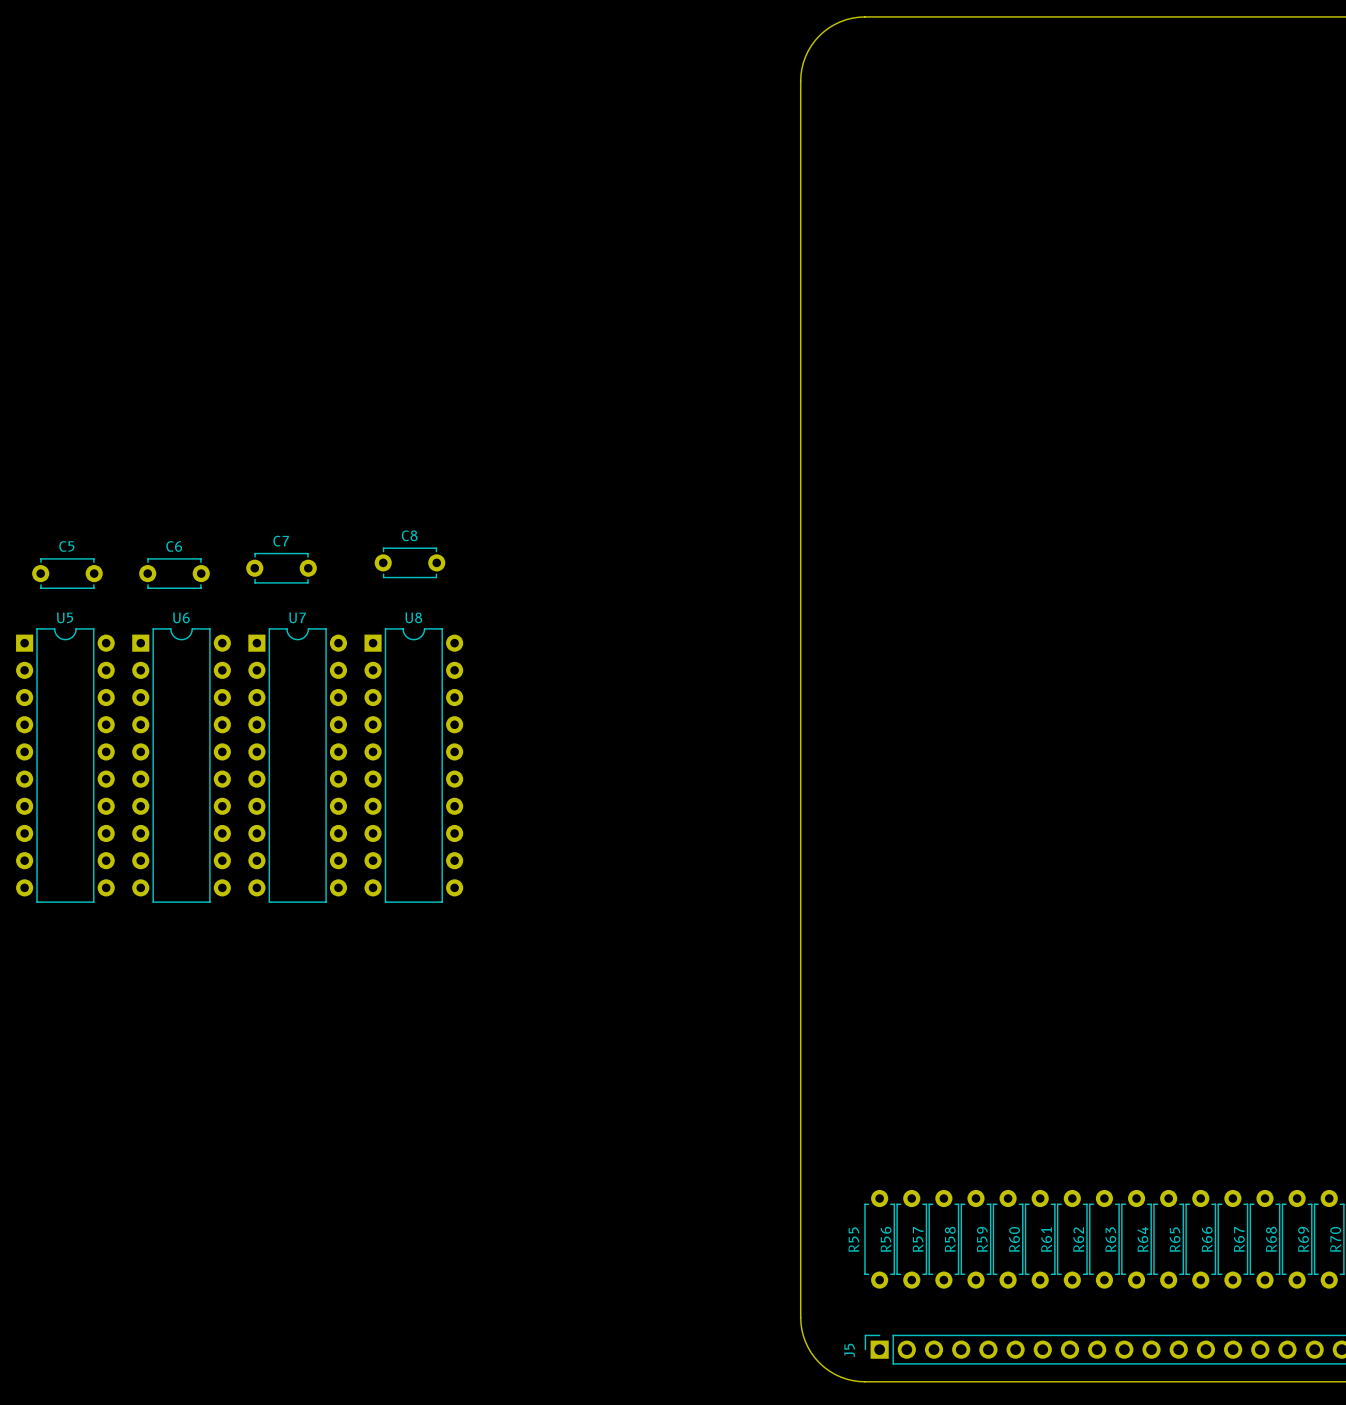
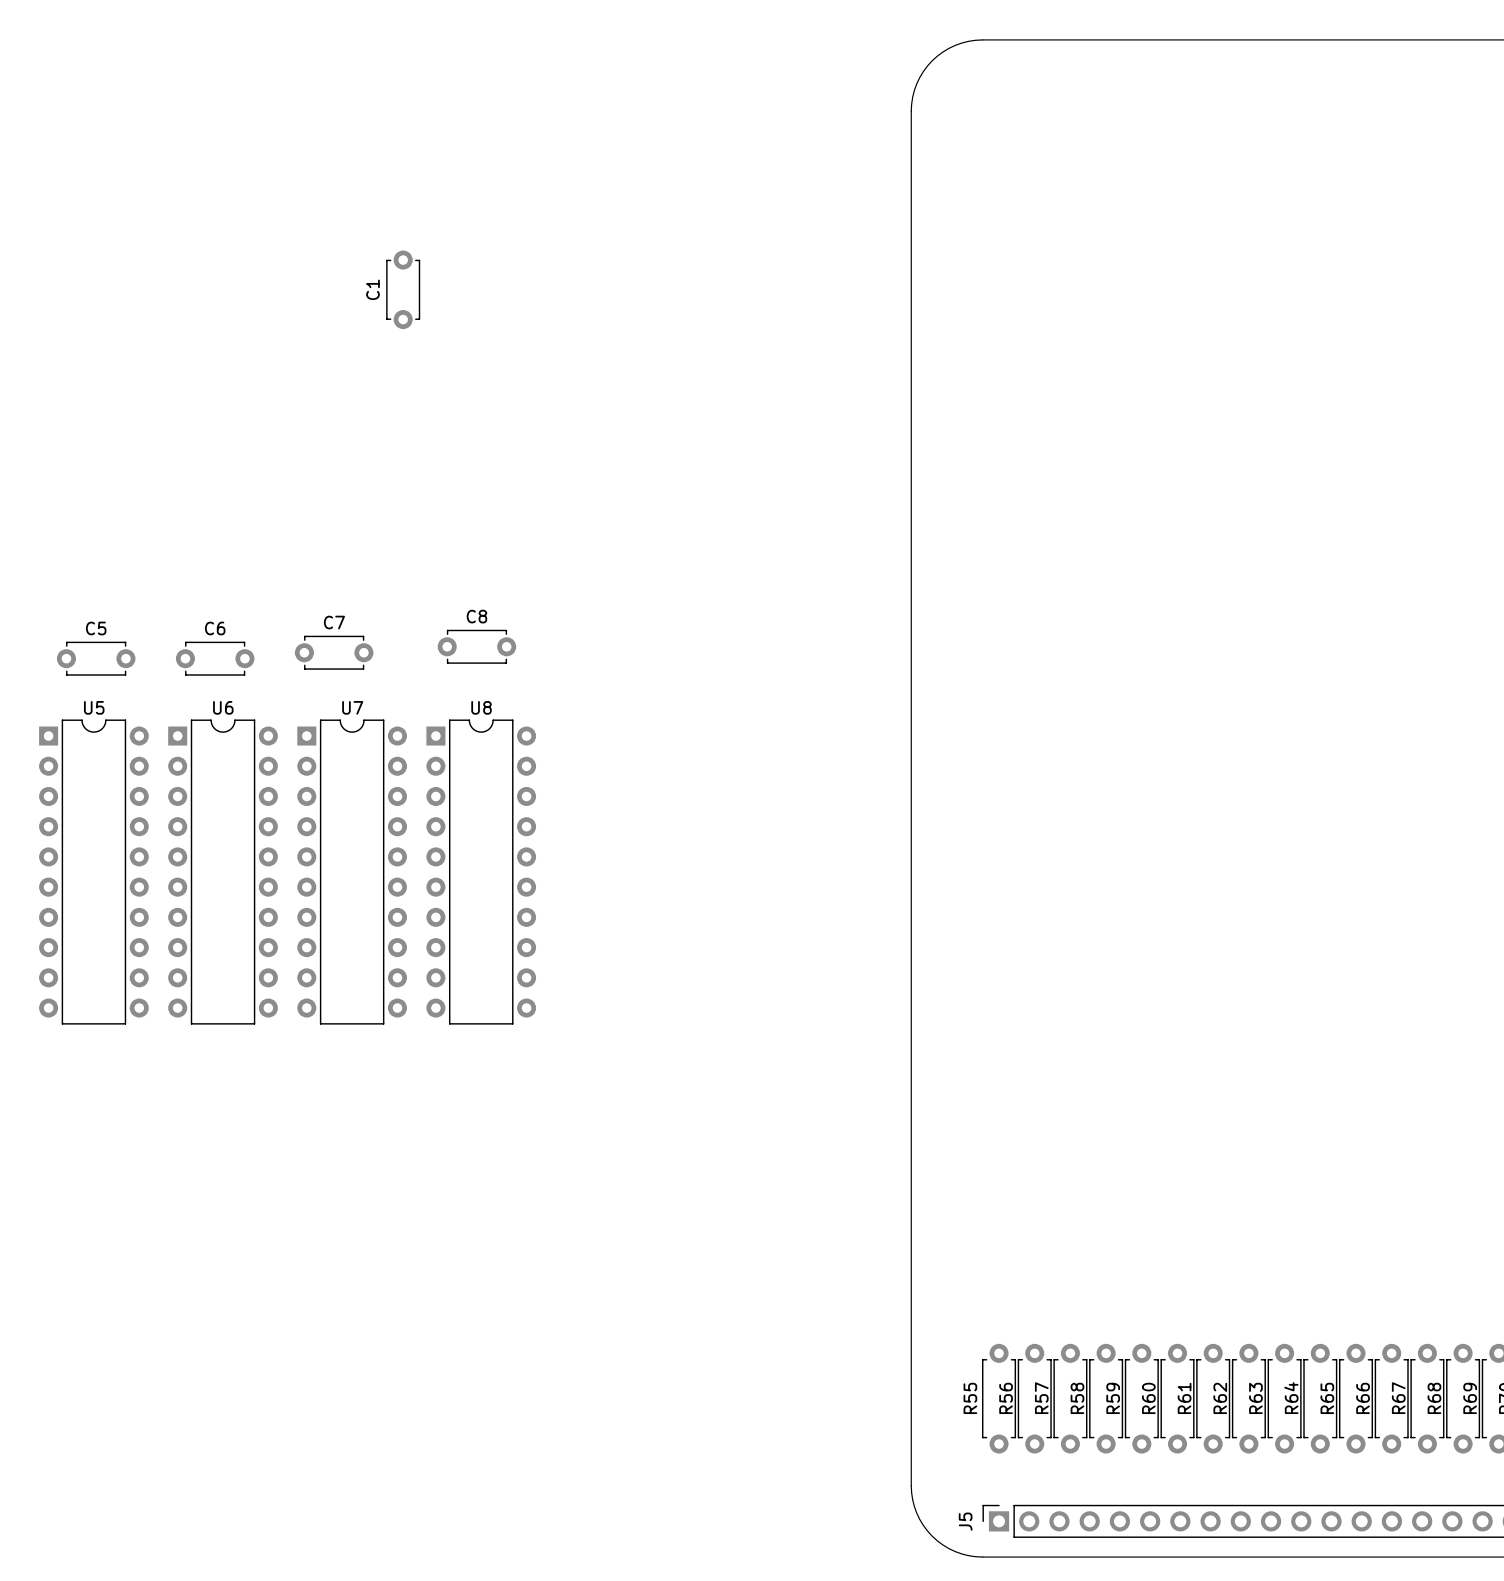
C1: none -> (403, 289)

